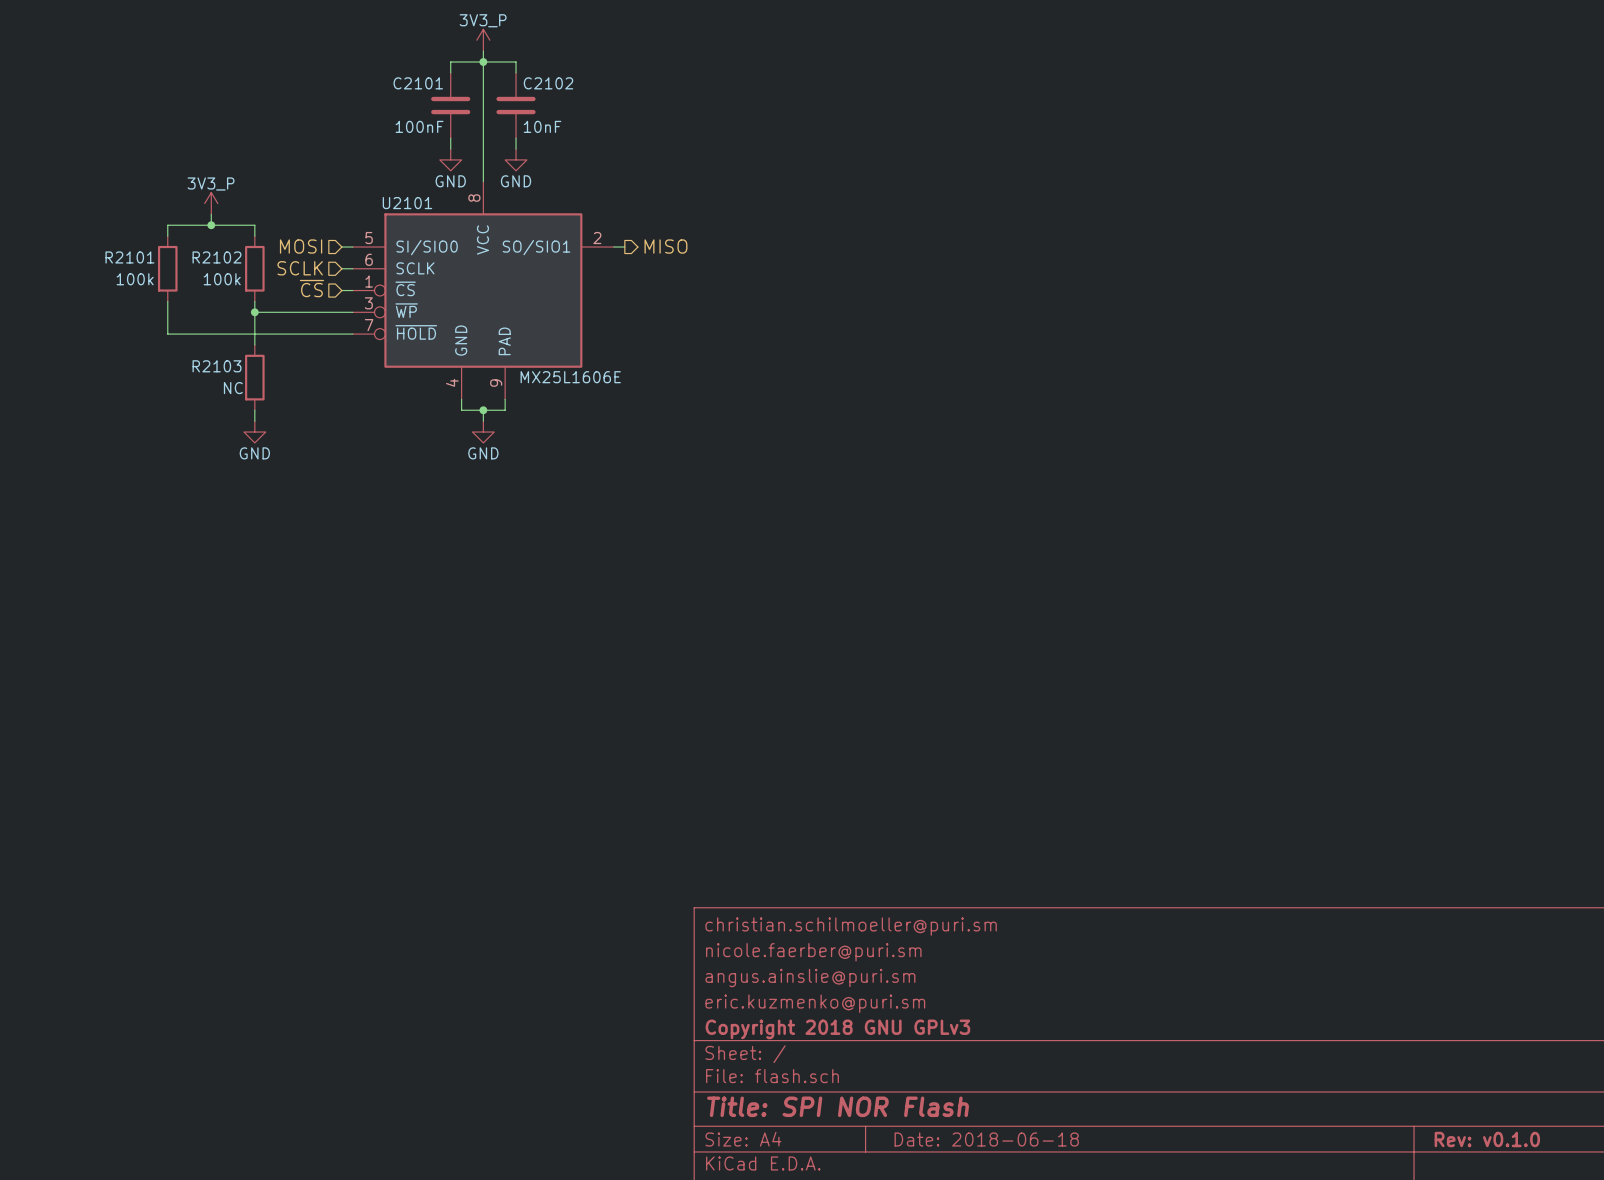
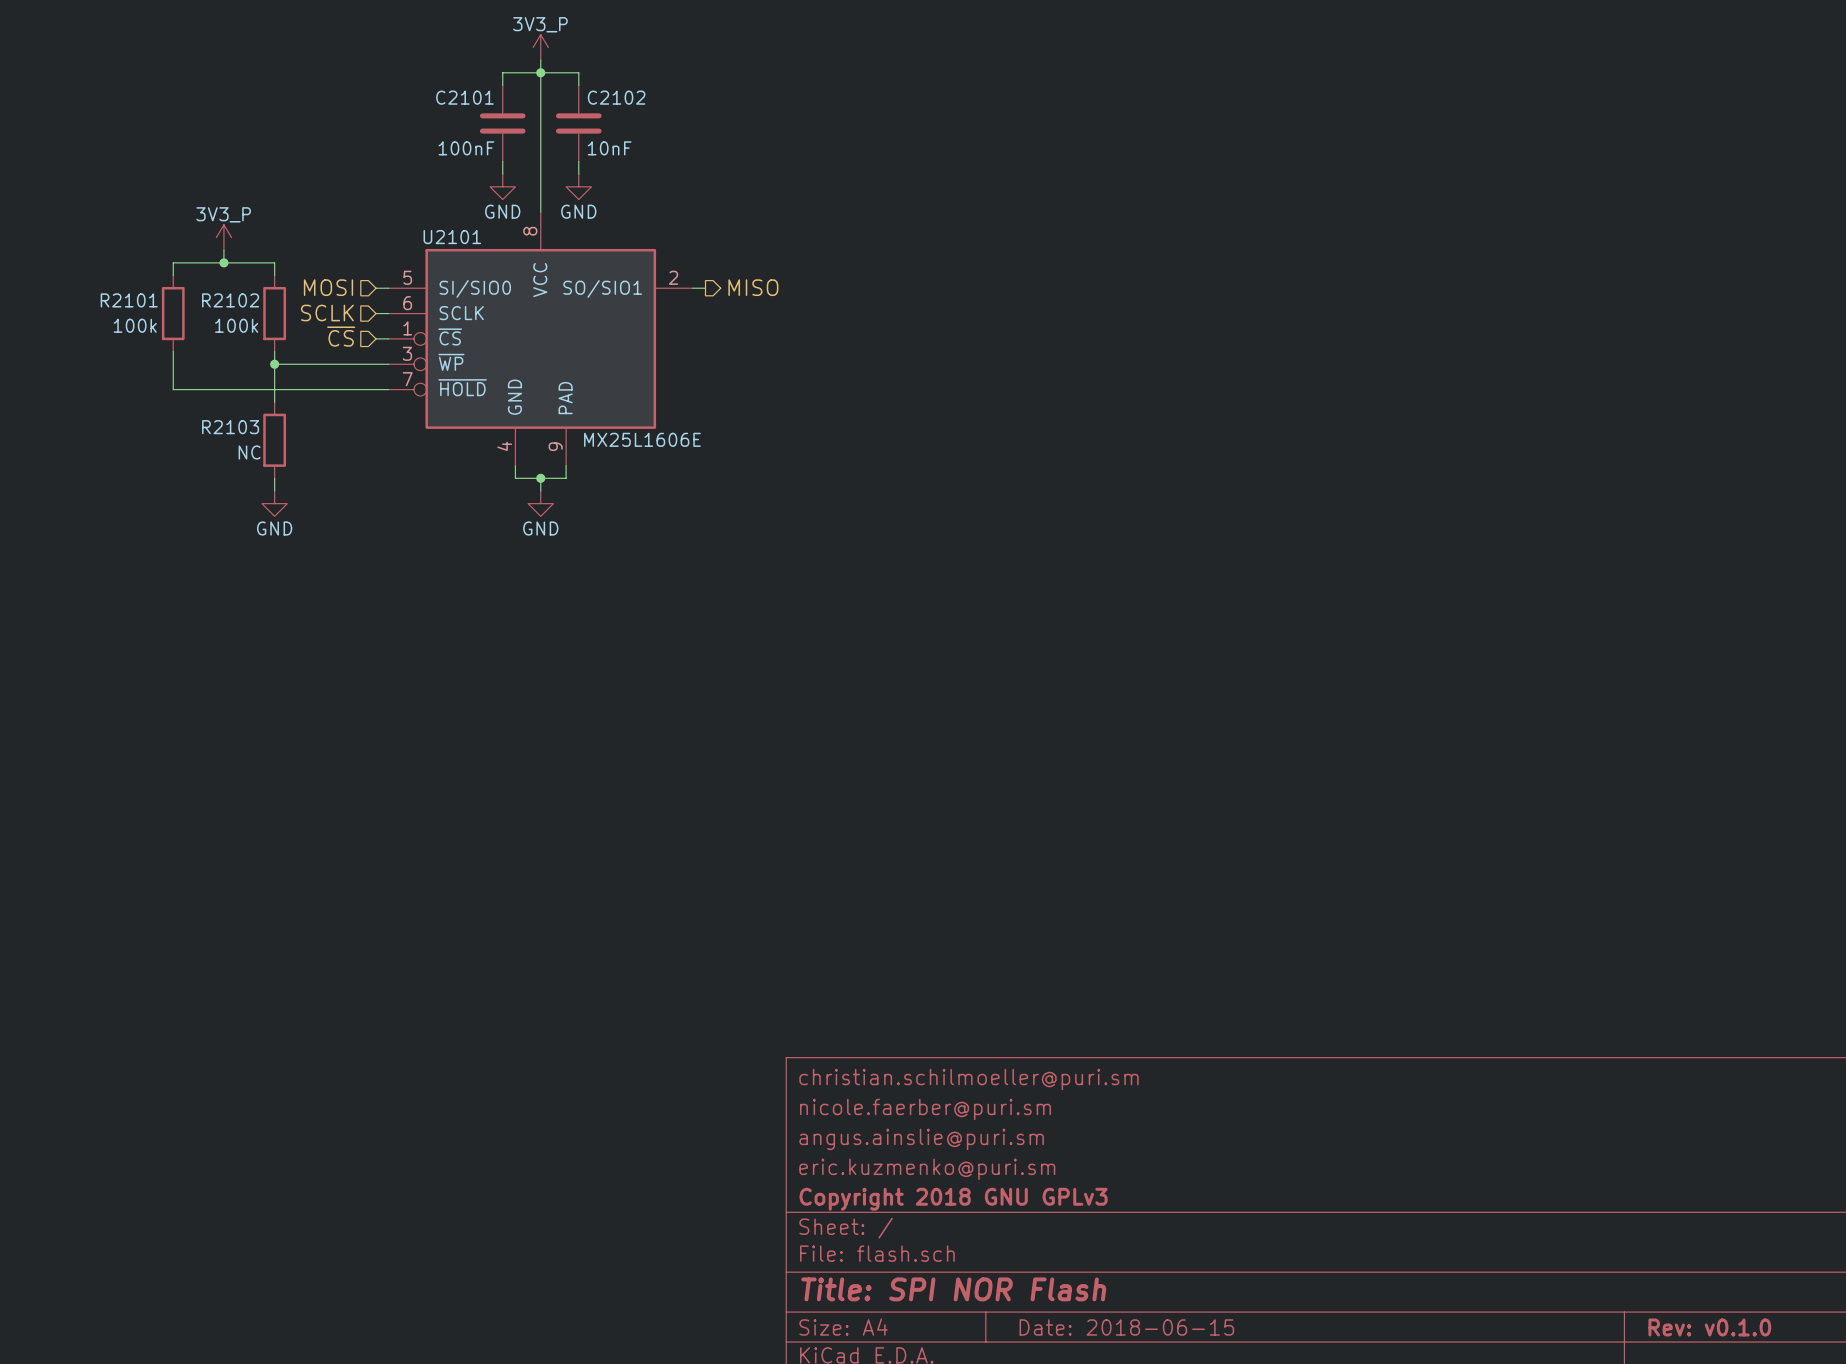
title block: Date: 2018-06-18 (986, 1139) -> Date: 2018-06-15 (1126, 1327)

